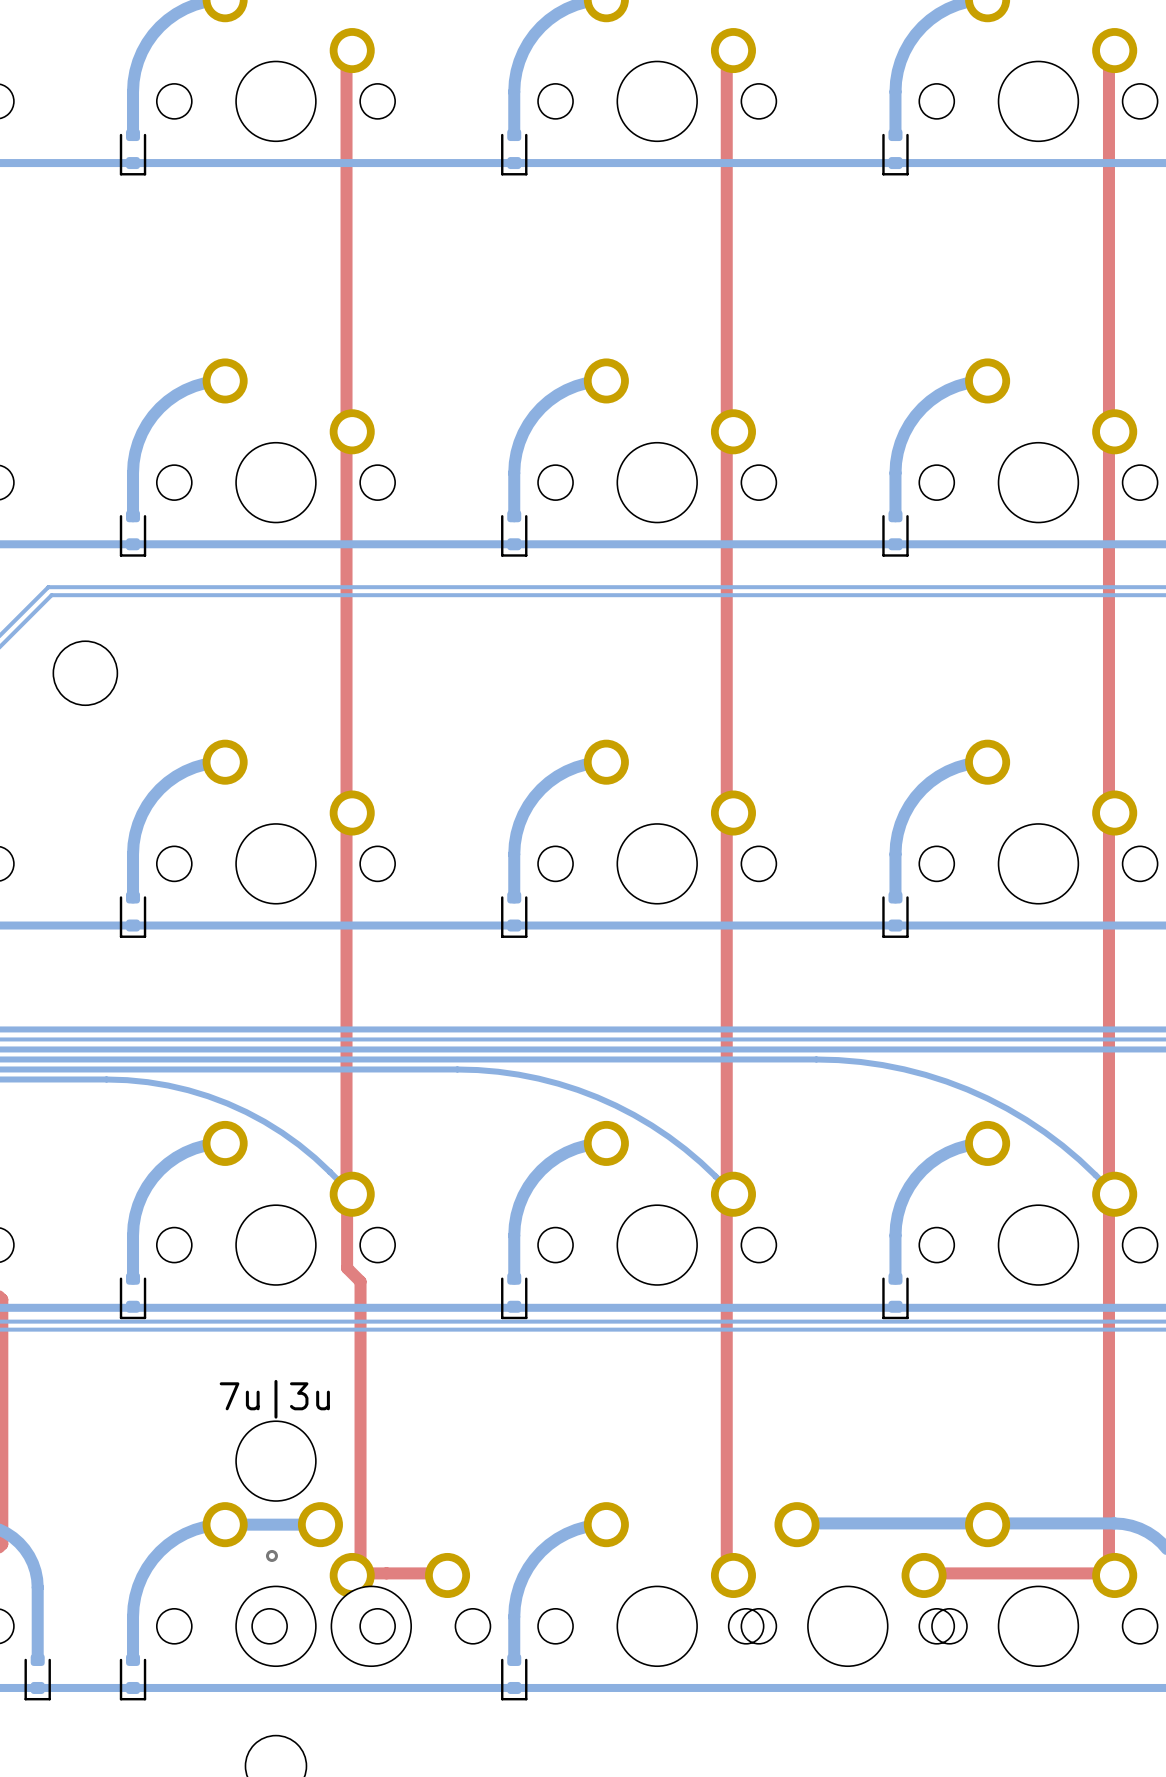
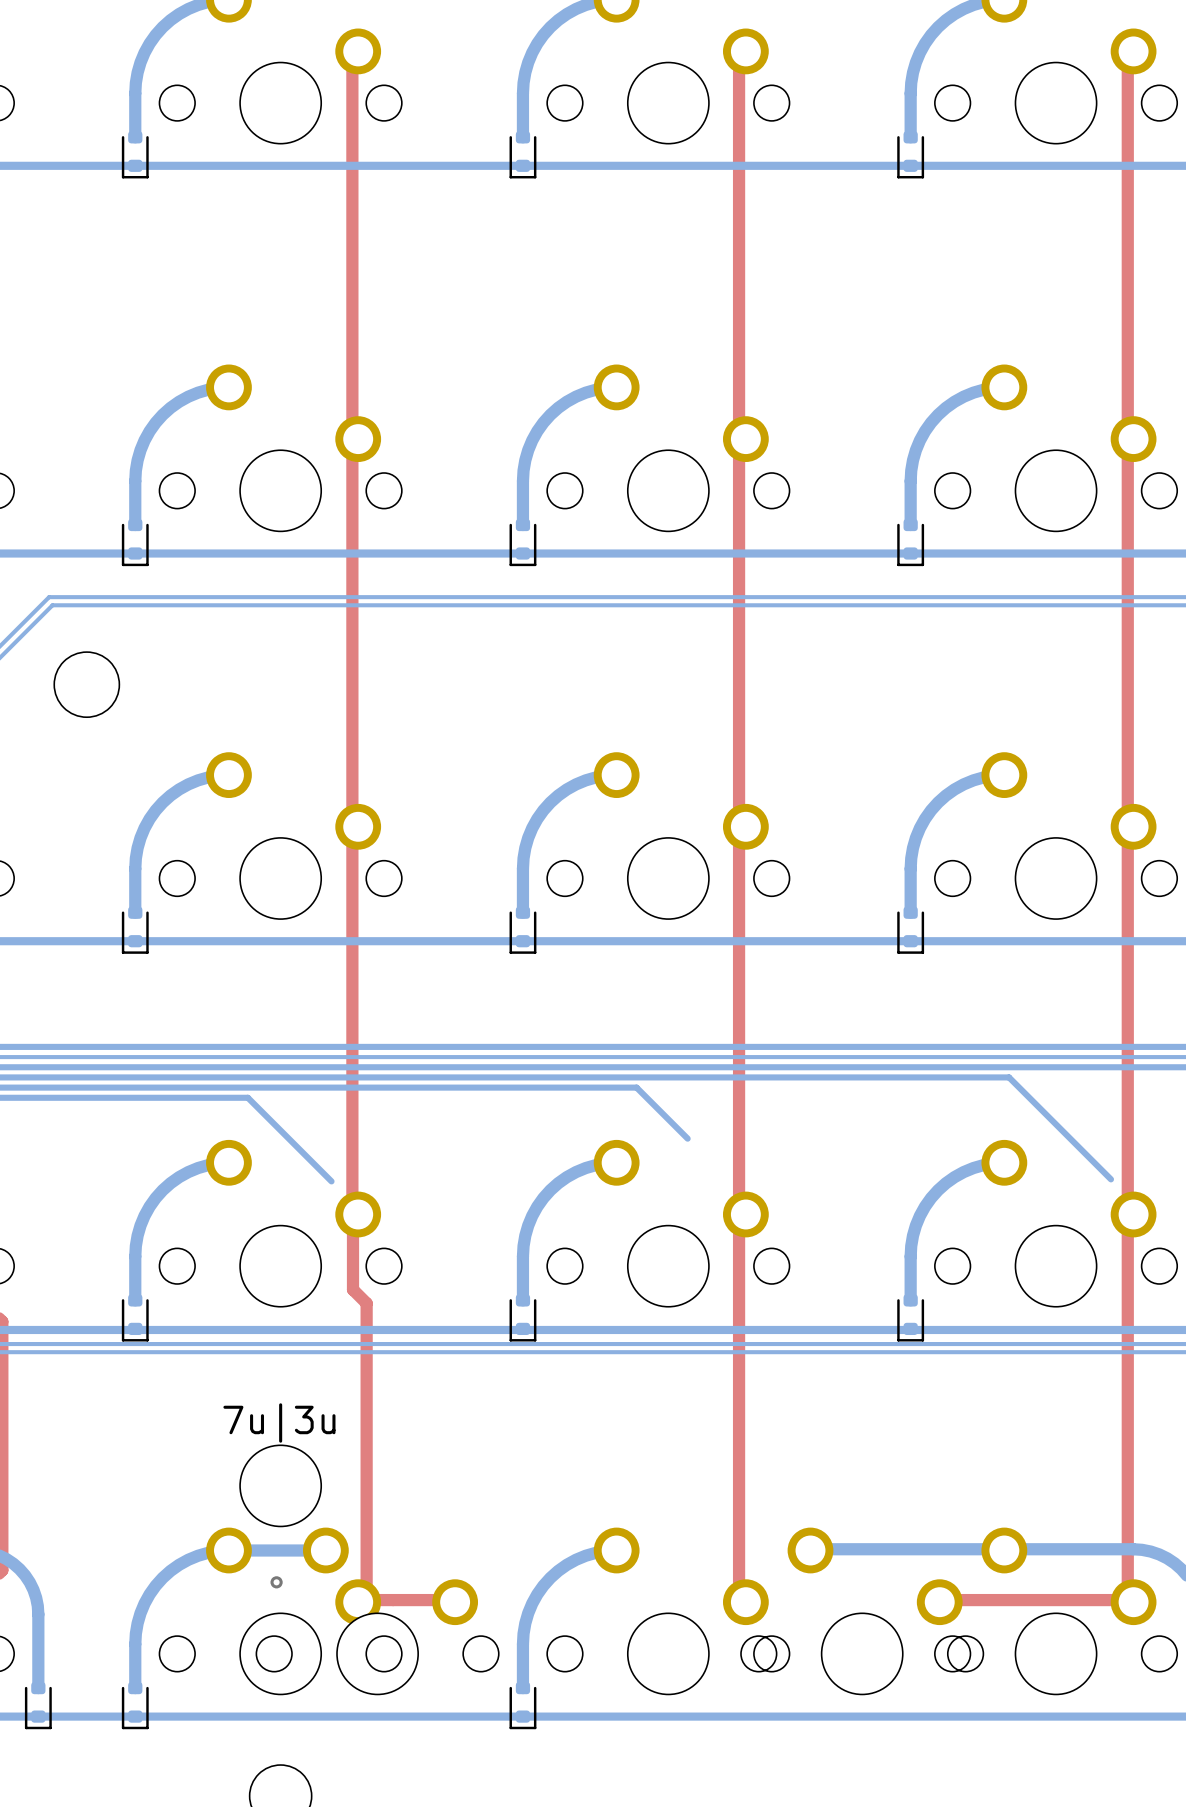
bottom track: (816, 1059) (860, 1061) (904, 1069) (946, 1081) (987, 1098) (1026, 1119) (1062, 1145) (1114, 1194) -> (830, 1077) (1009, 1077) (1110, 1179)
bottom track: (457, 1069) (498, 1071) (538, 1078) (578, 1089) (615, 1105) (651, 1125) (685, 1149) (733, 1194) -> (465, 1087) (636, 1087) (687, 1138)
bottom track: (106, 1079) (168, 1085) (208, 1096) (246, 1112) (298, 1144) (352, 1194) -> (108, 1097) (247, 1097) (331, 1181)

